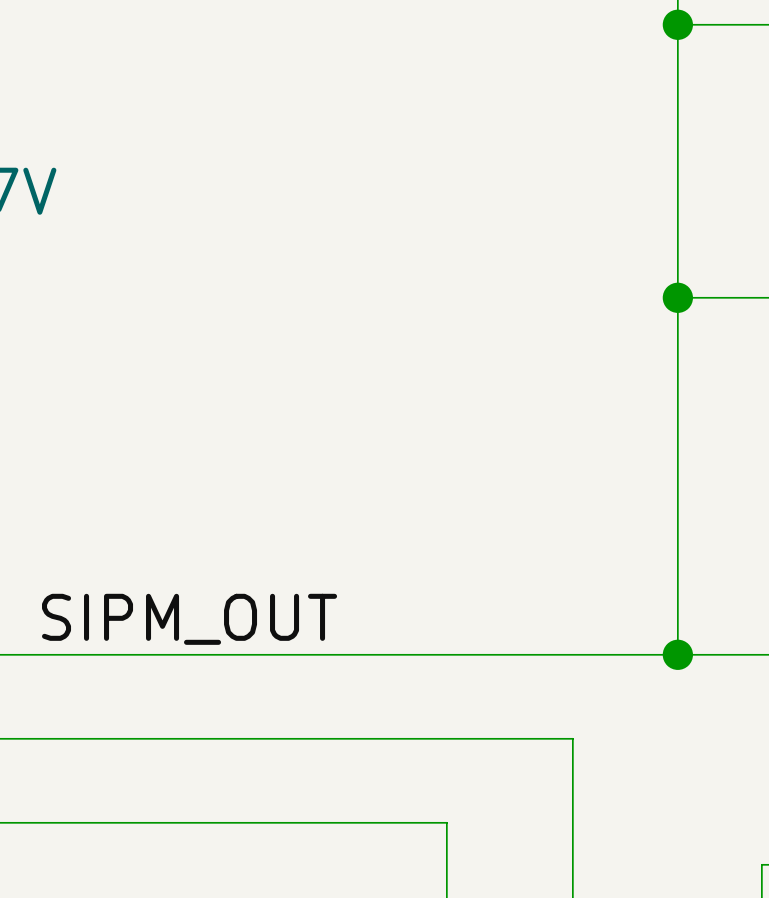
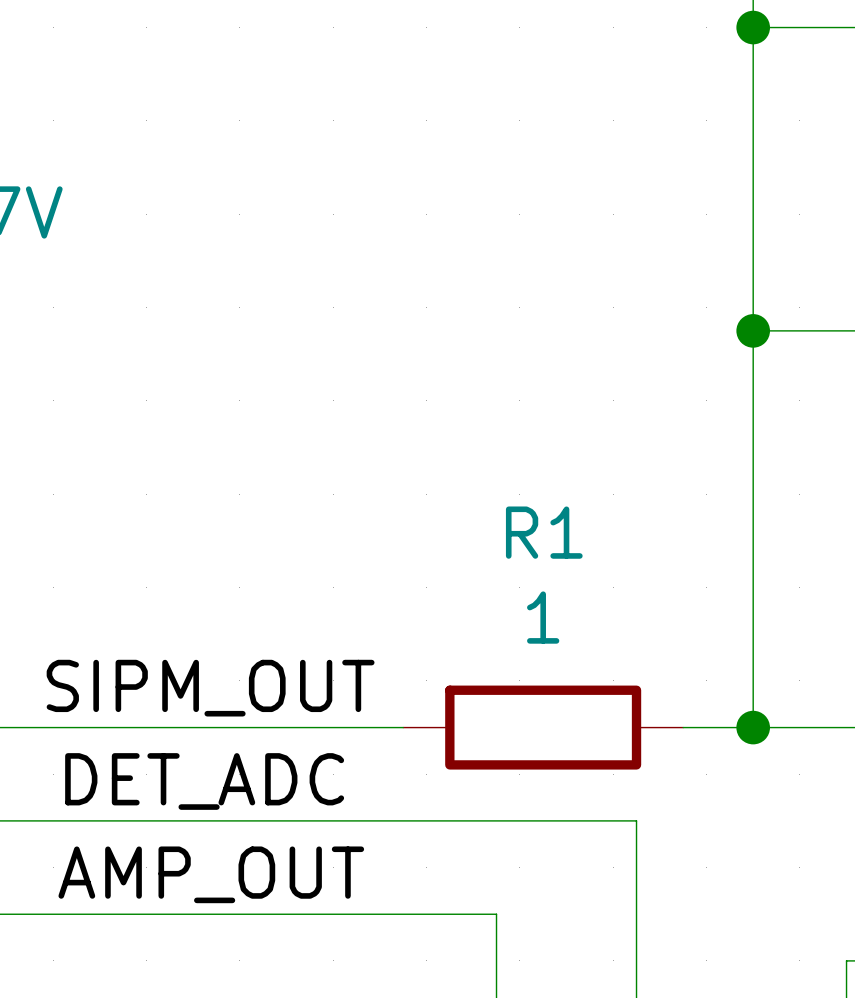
wire: (362, 654) (614, 654) -> none
R1: none -> 1 (543, 727)
label: none -> DET_ADC (204, 781)
label: none -> AMP_OUT (211, 874)

